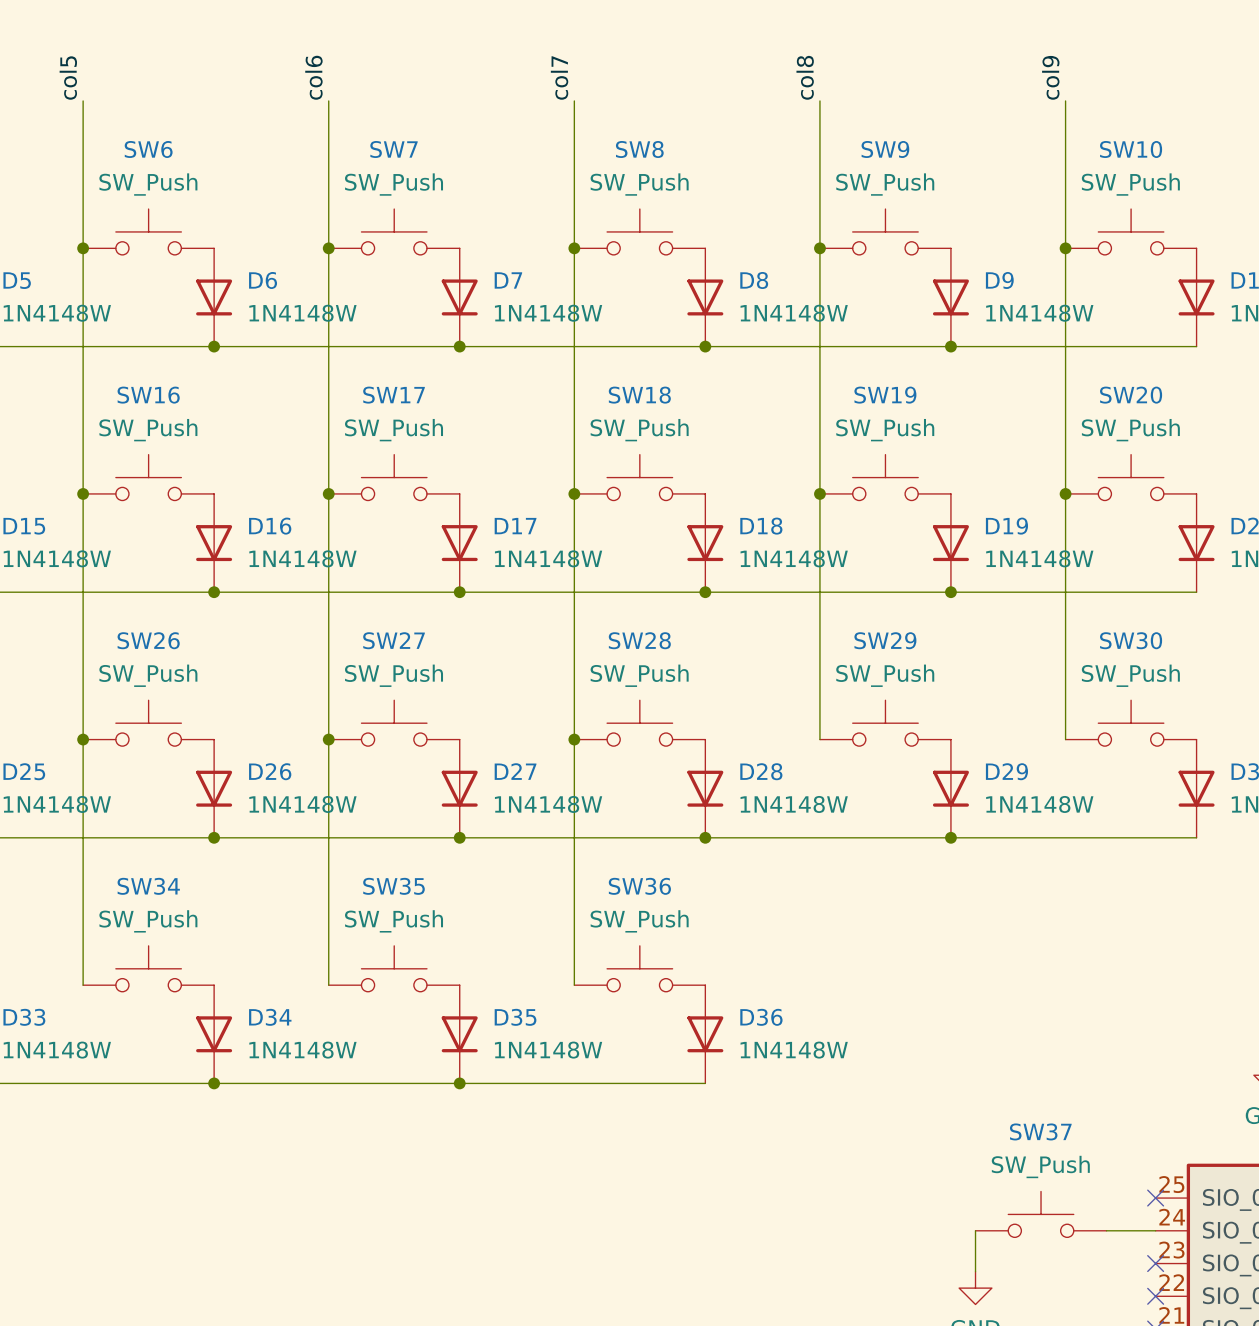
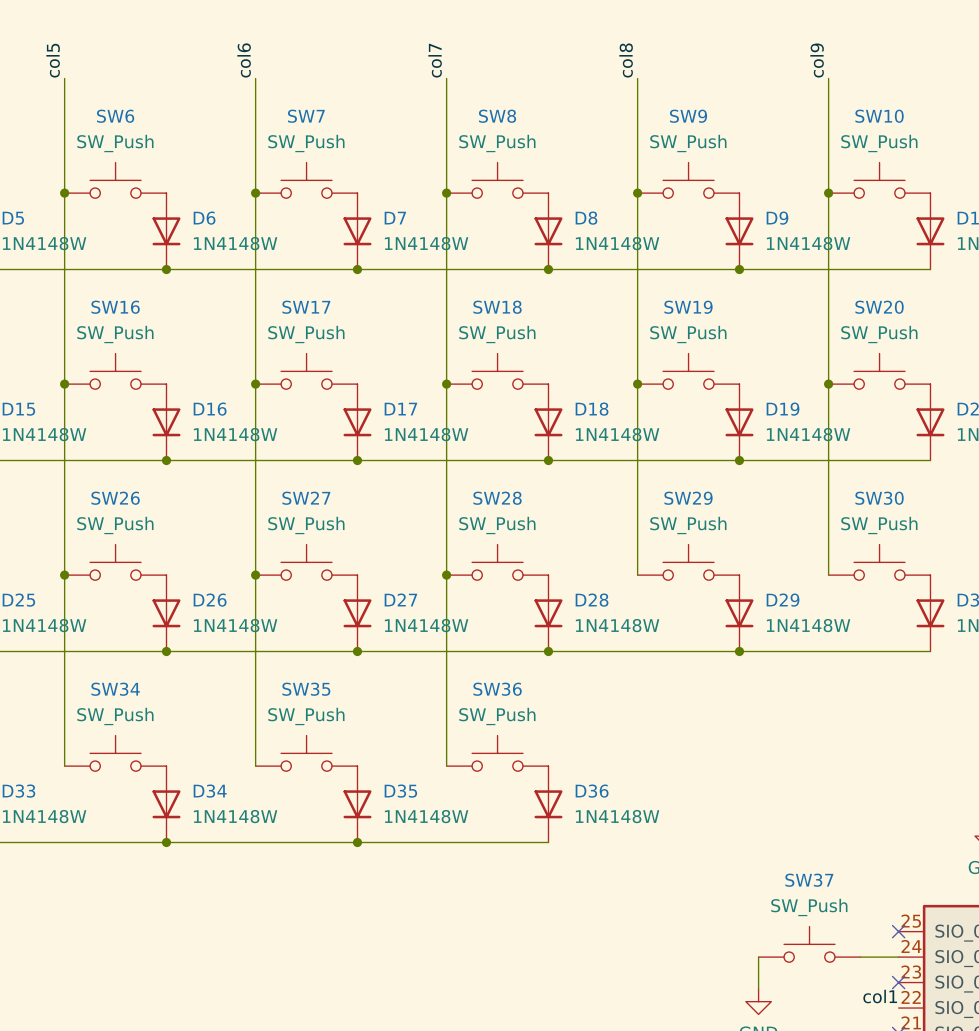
label: none -> col1 (880, 996)
no-connect mark: (1155, 1296) -> none

